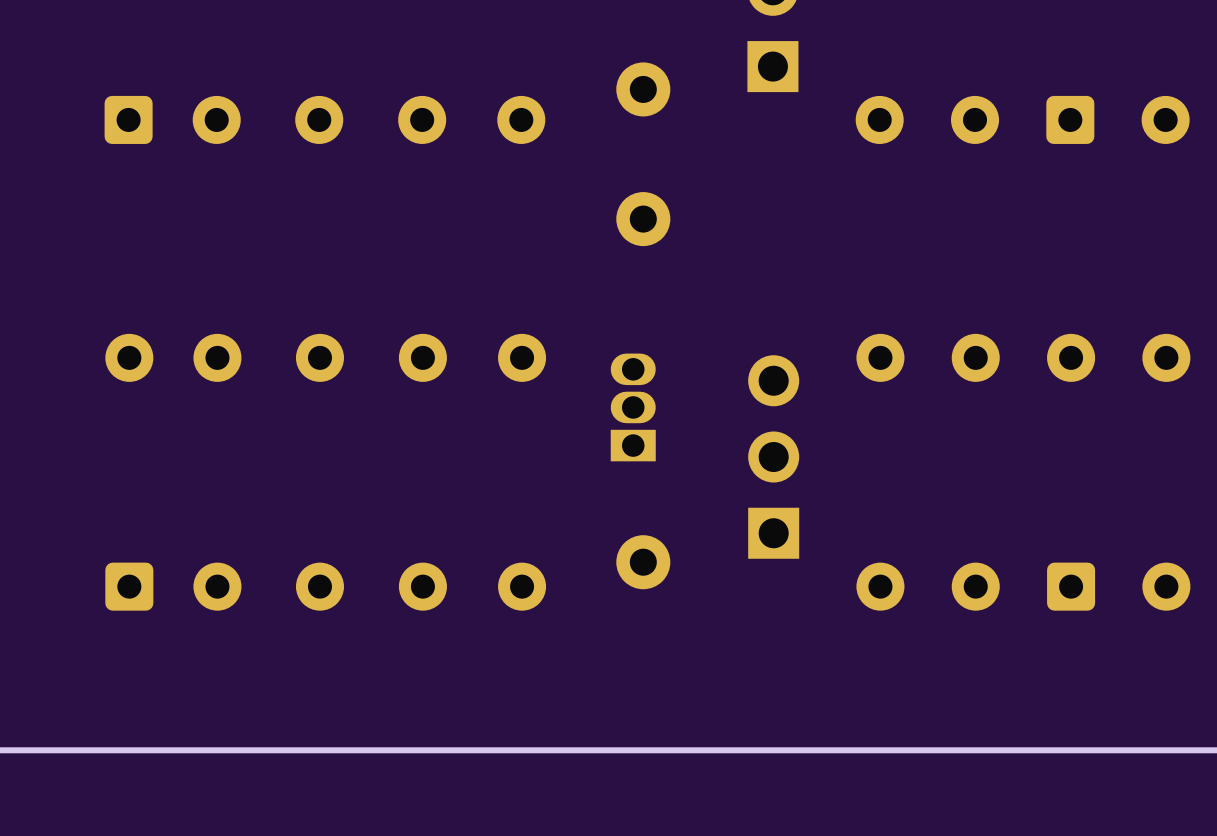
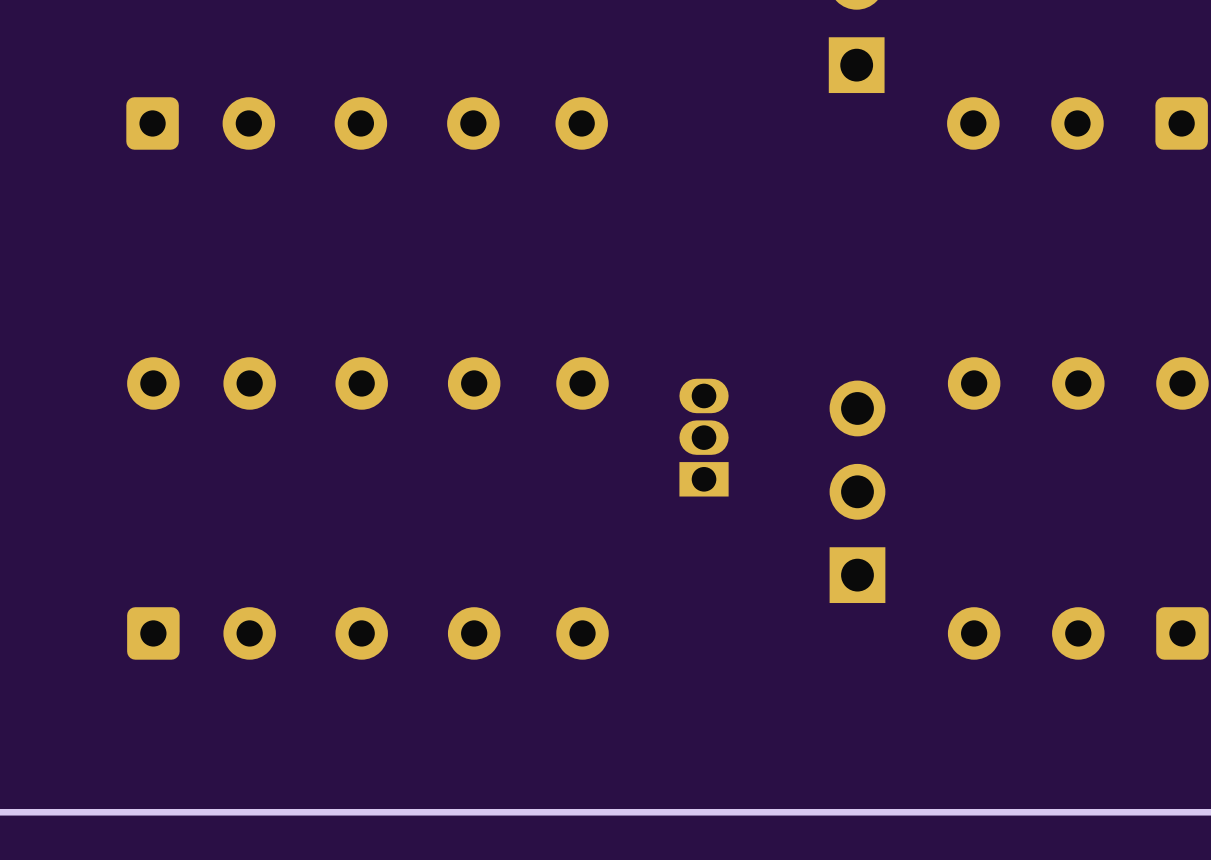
part: (643, 89) -> none
part: (643, 219) -> none
part: (643, 562) -> none

